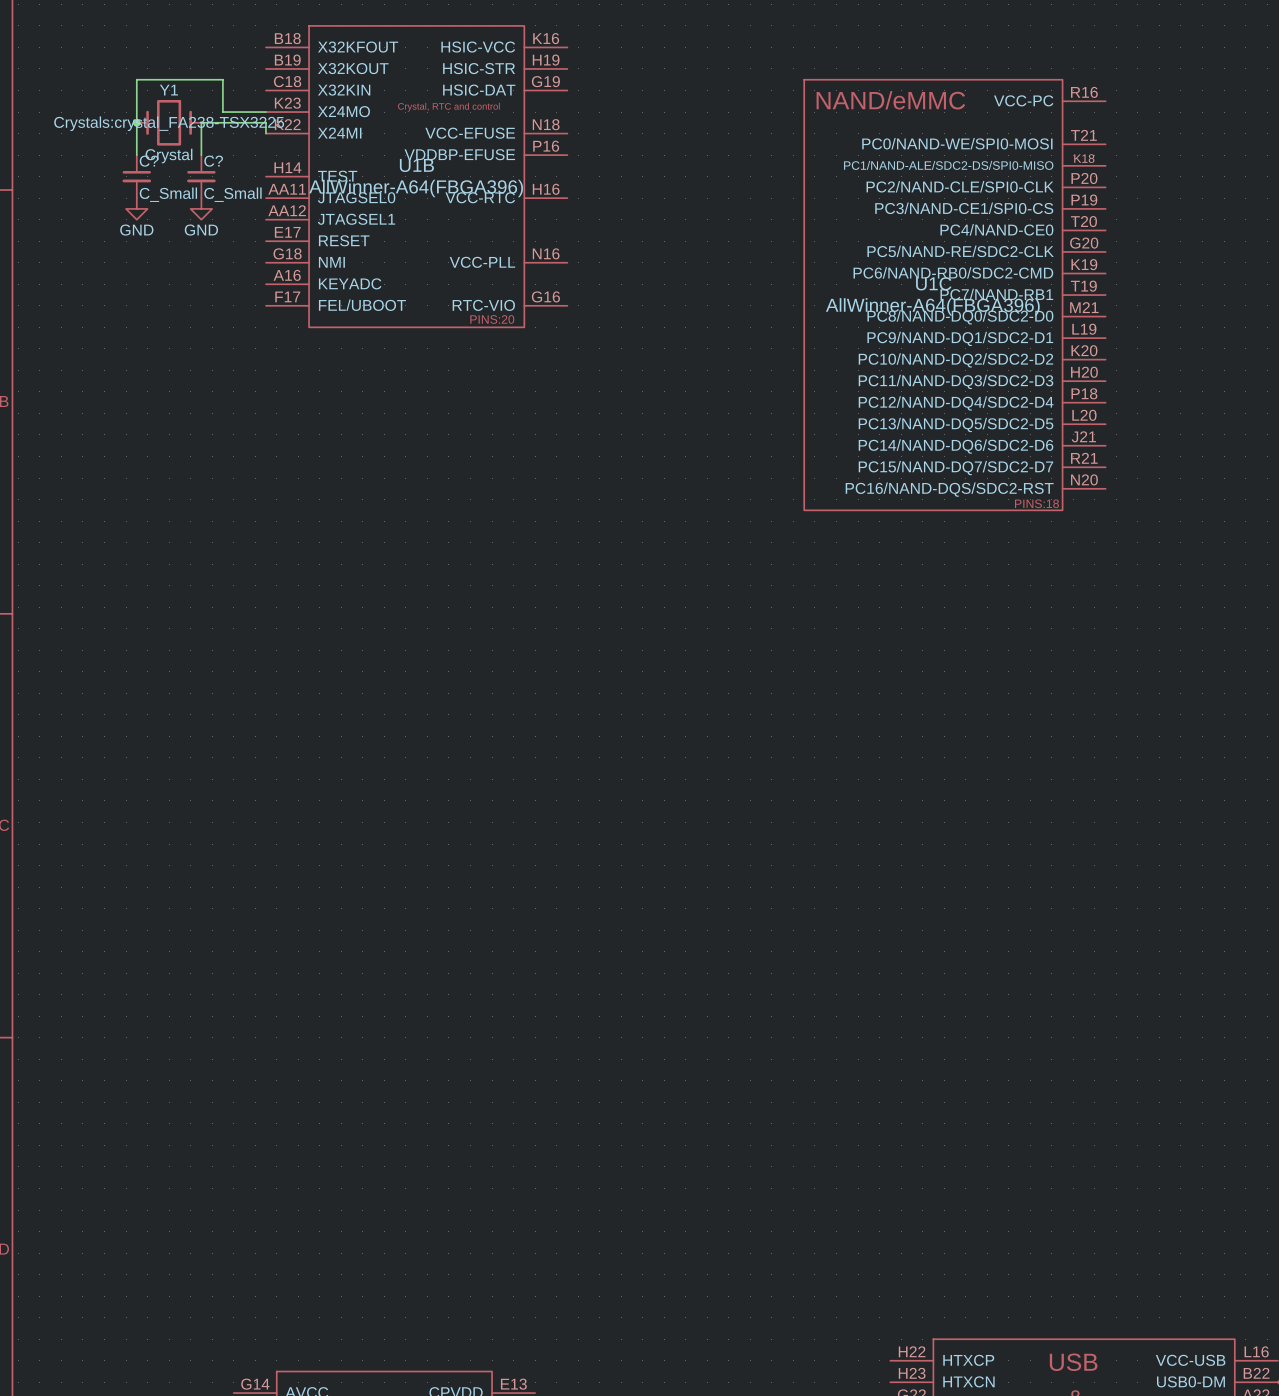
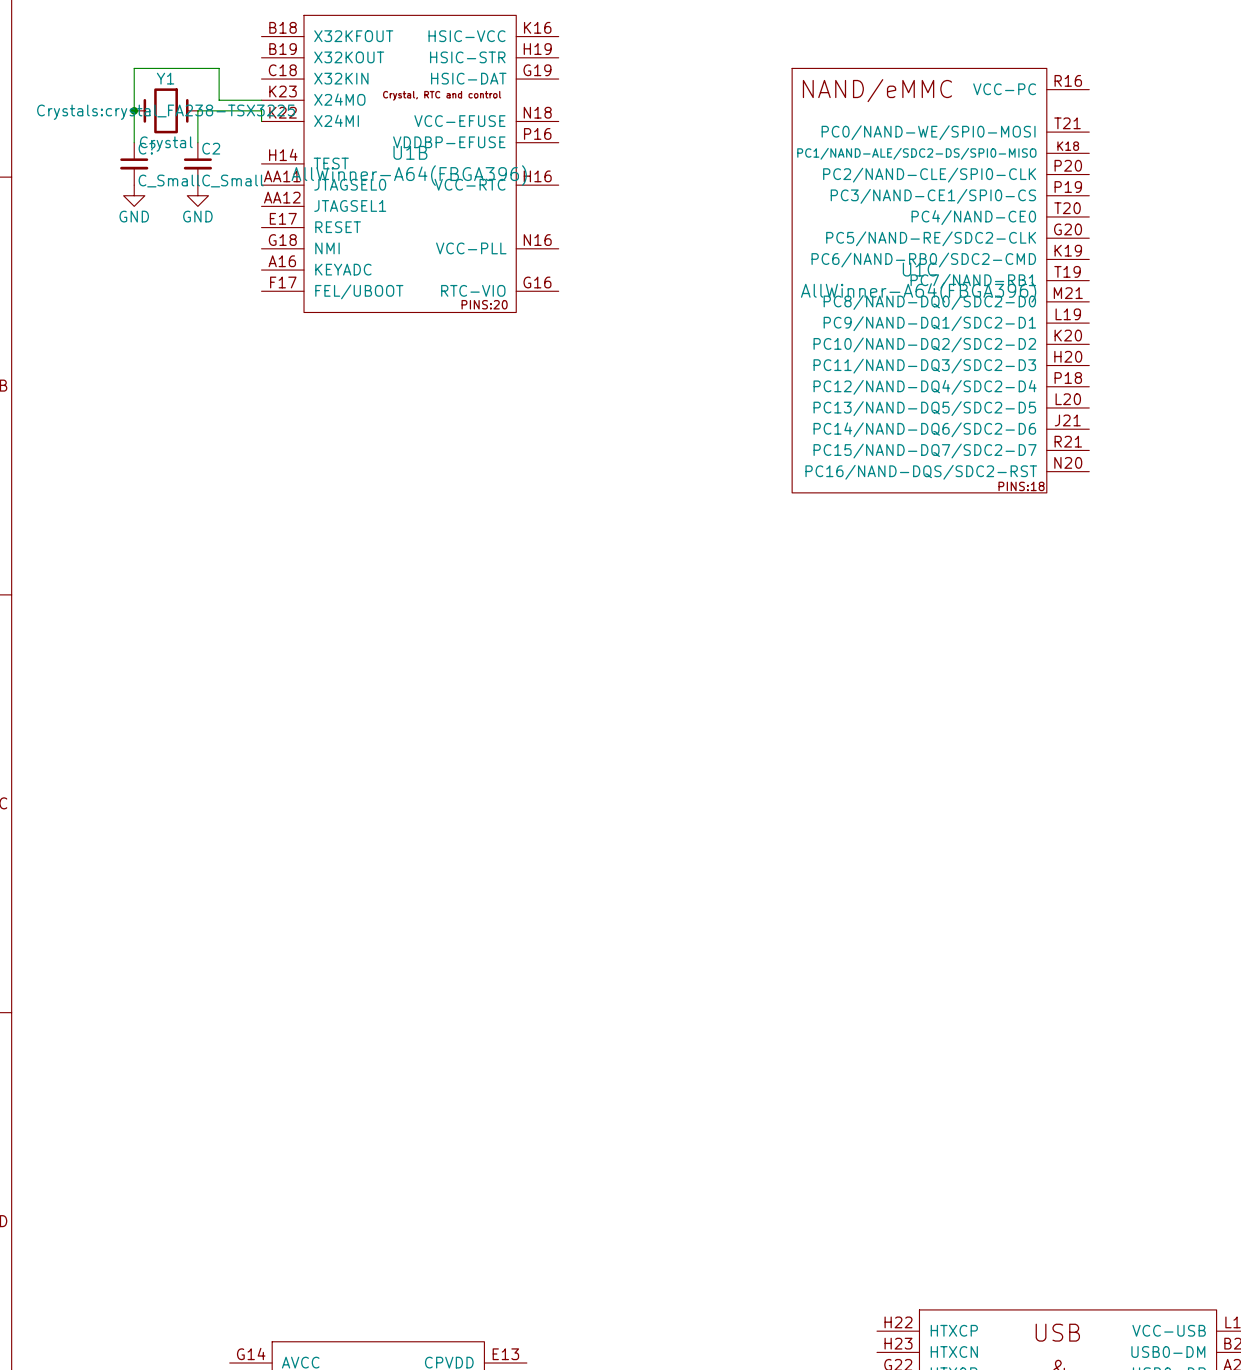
C? name: C? (213, 161) -> C2 (211, 148)

